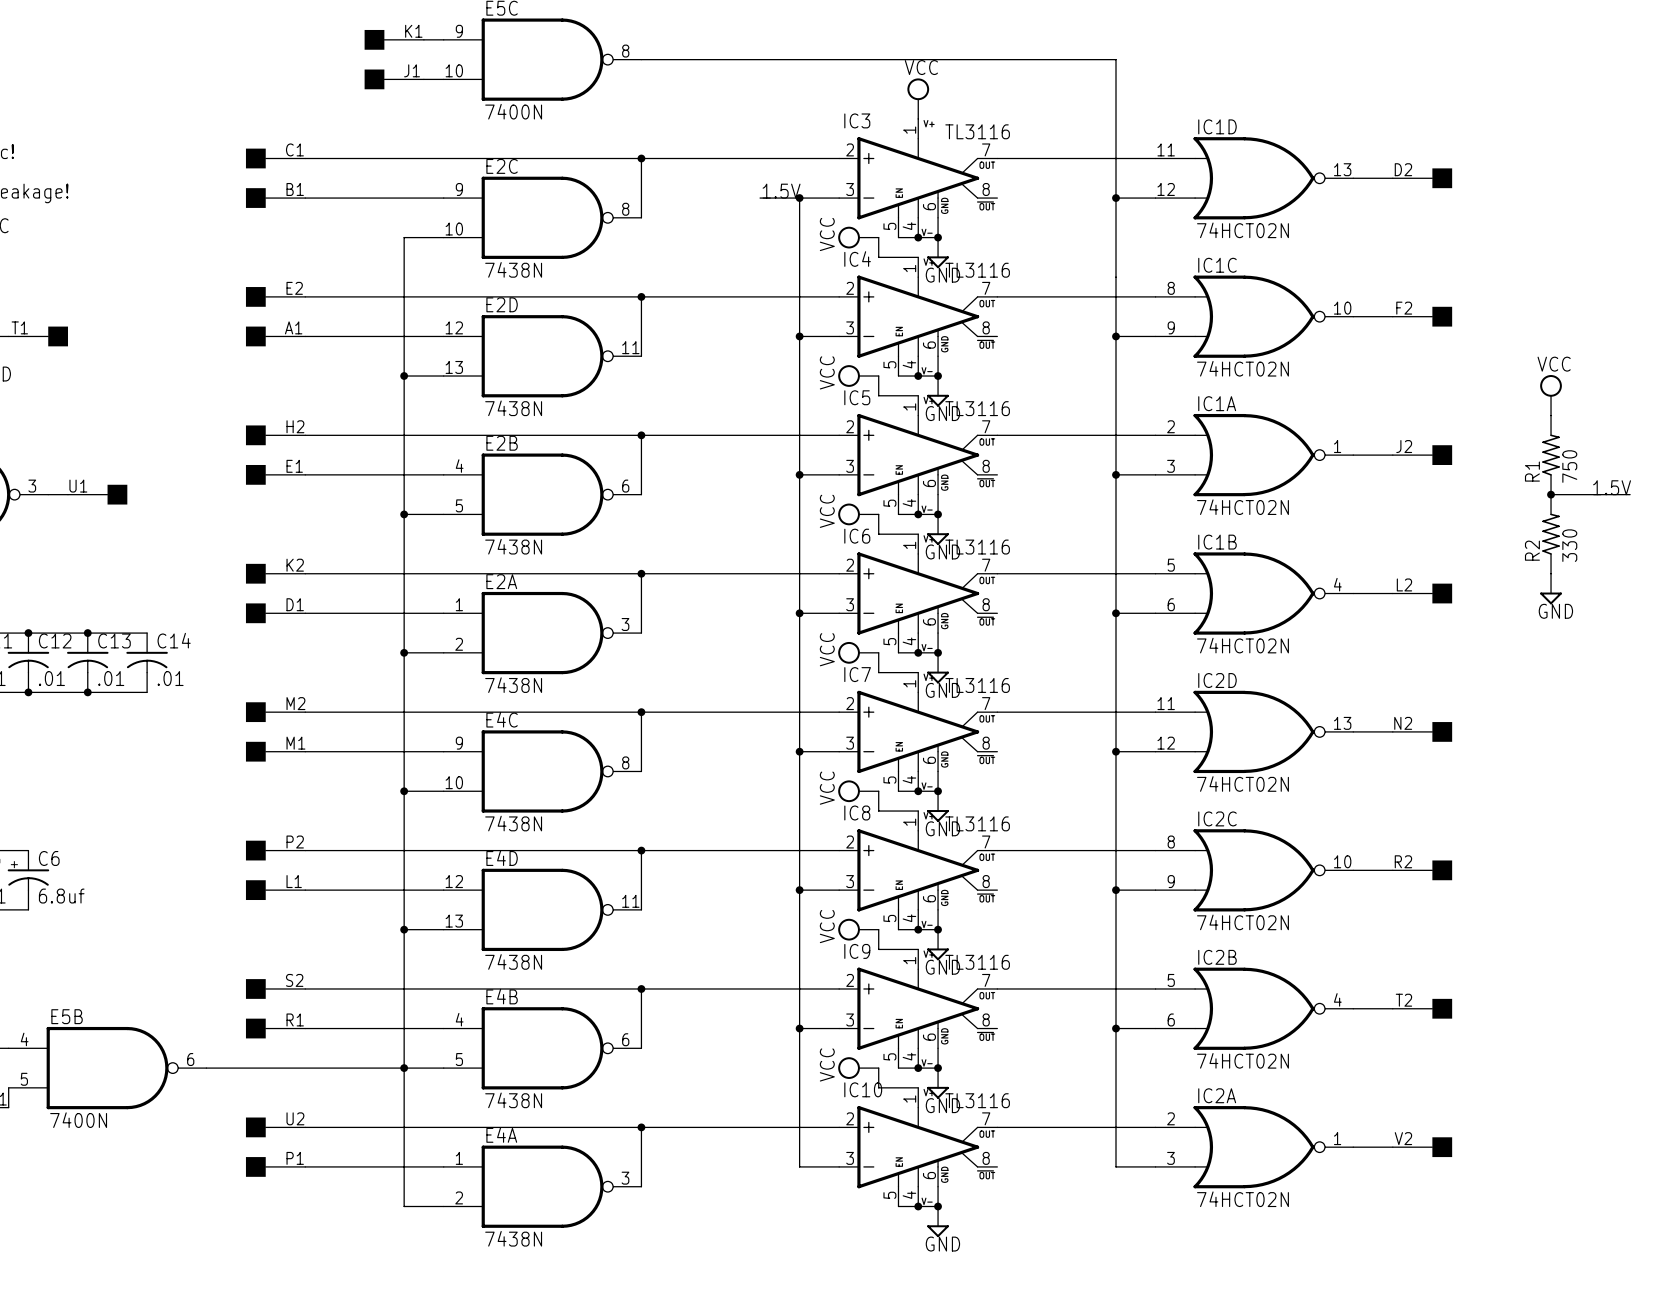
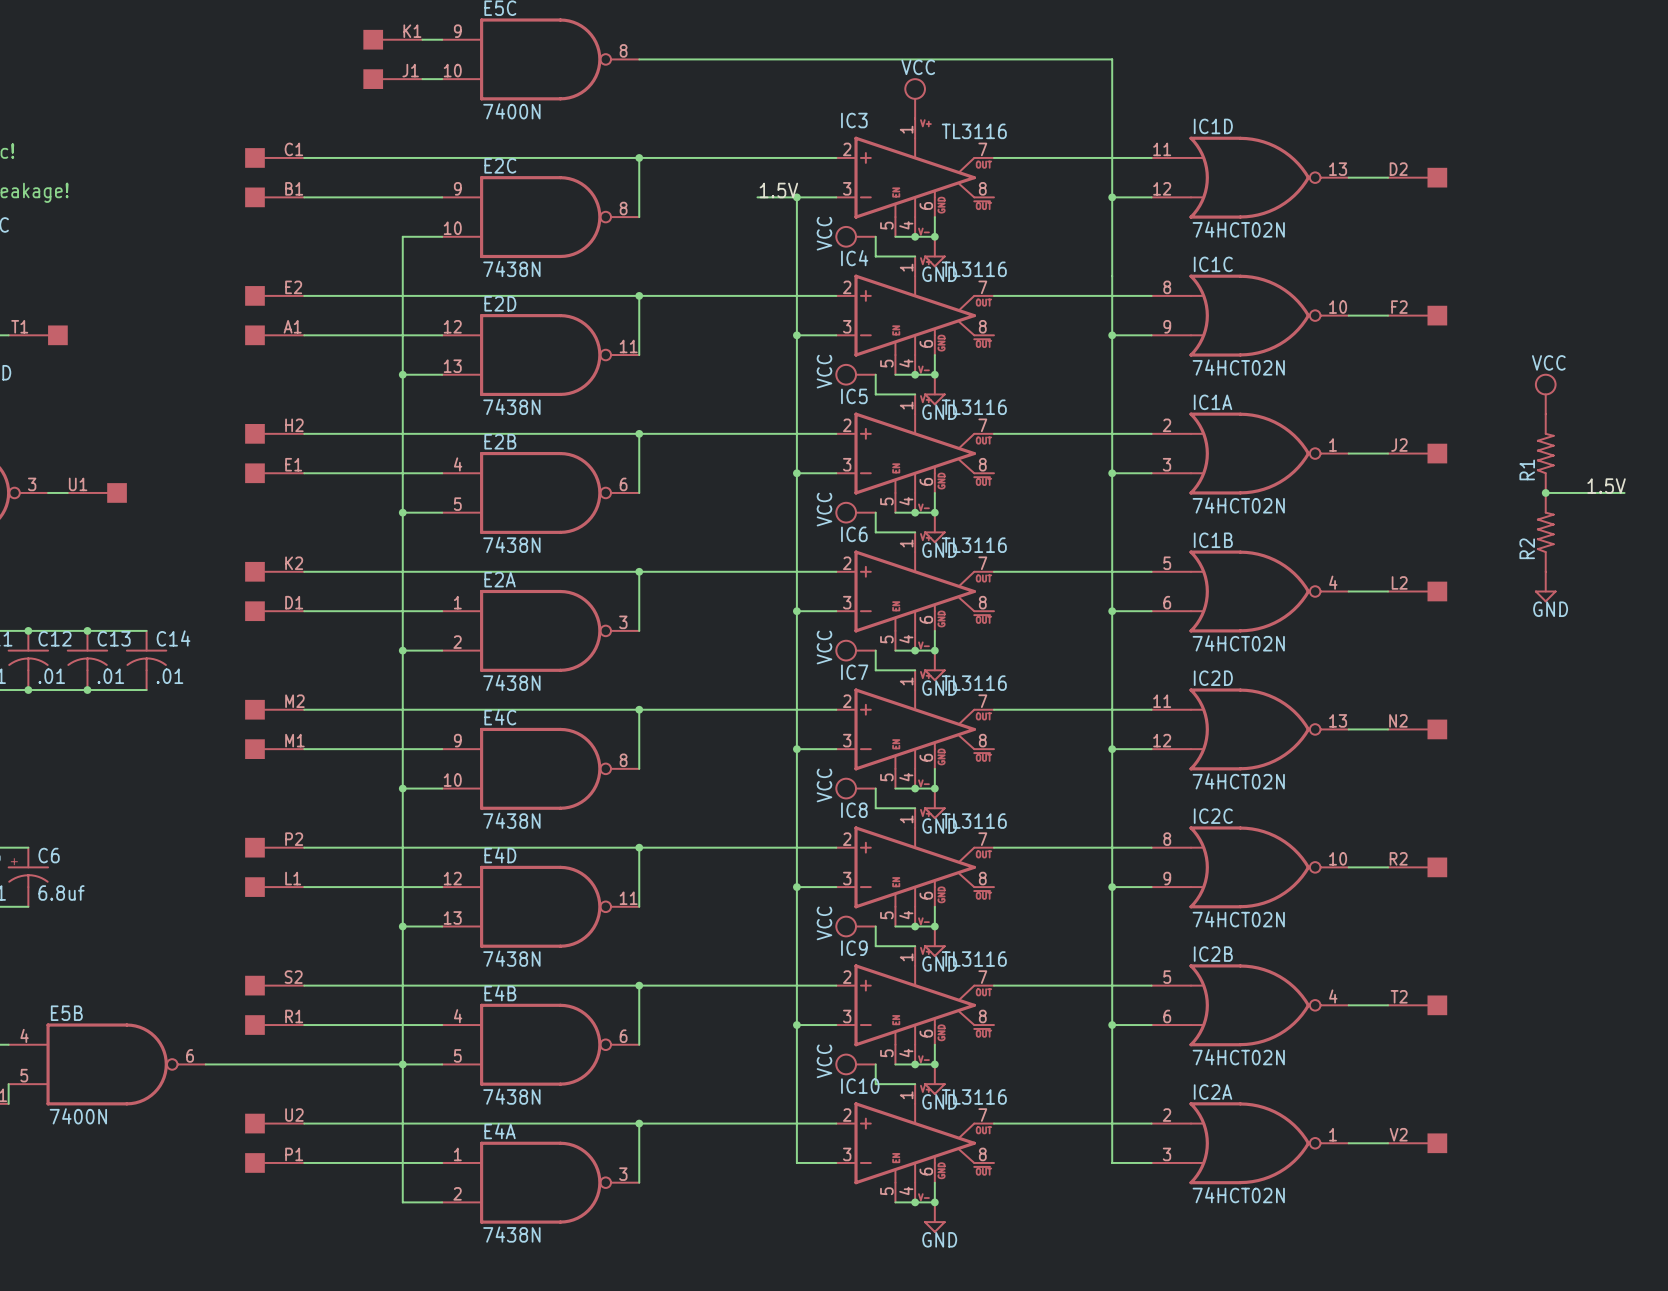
R1 value: 750 (1569, 466) -> none
R2 value: 330 (1569, 545) -> none

